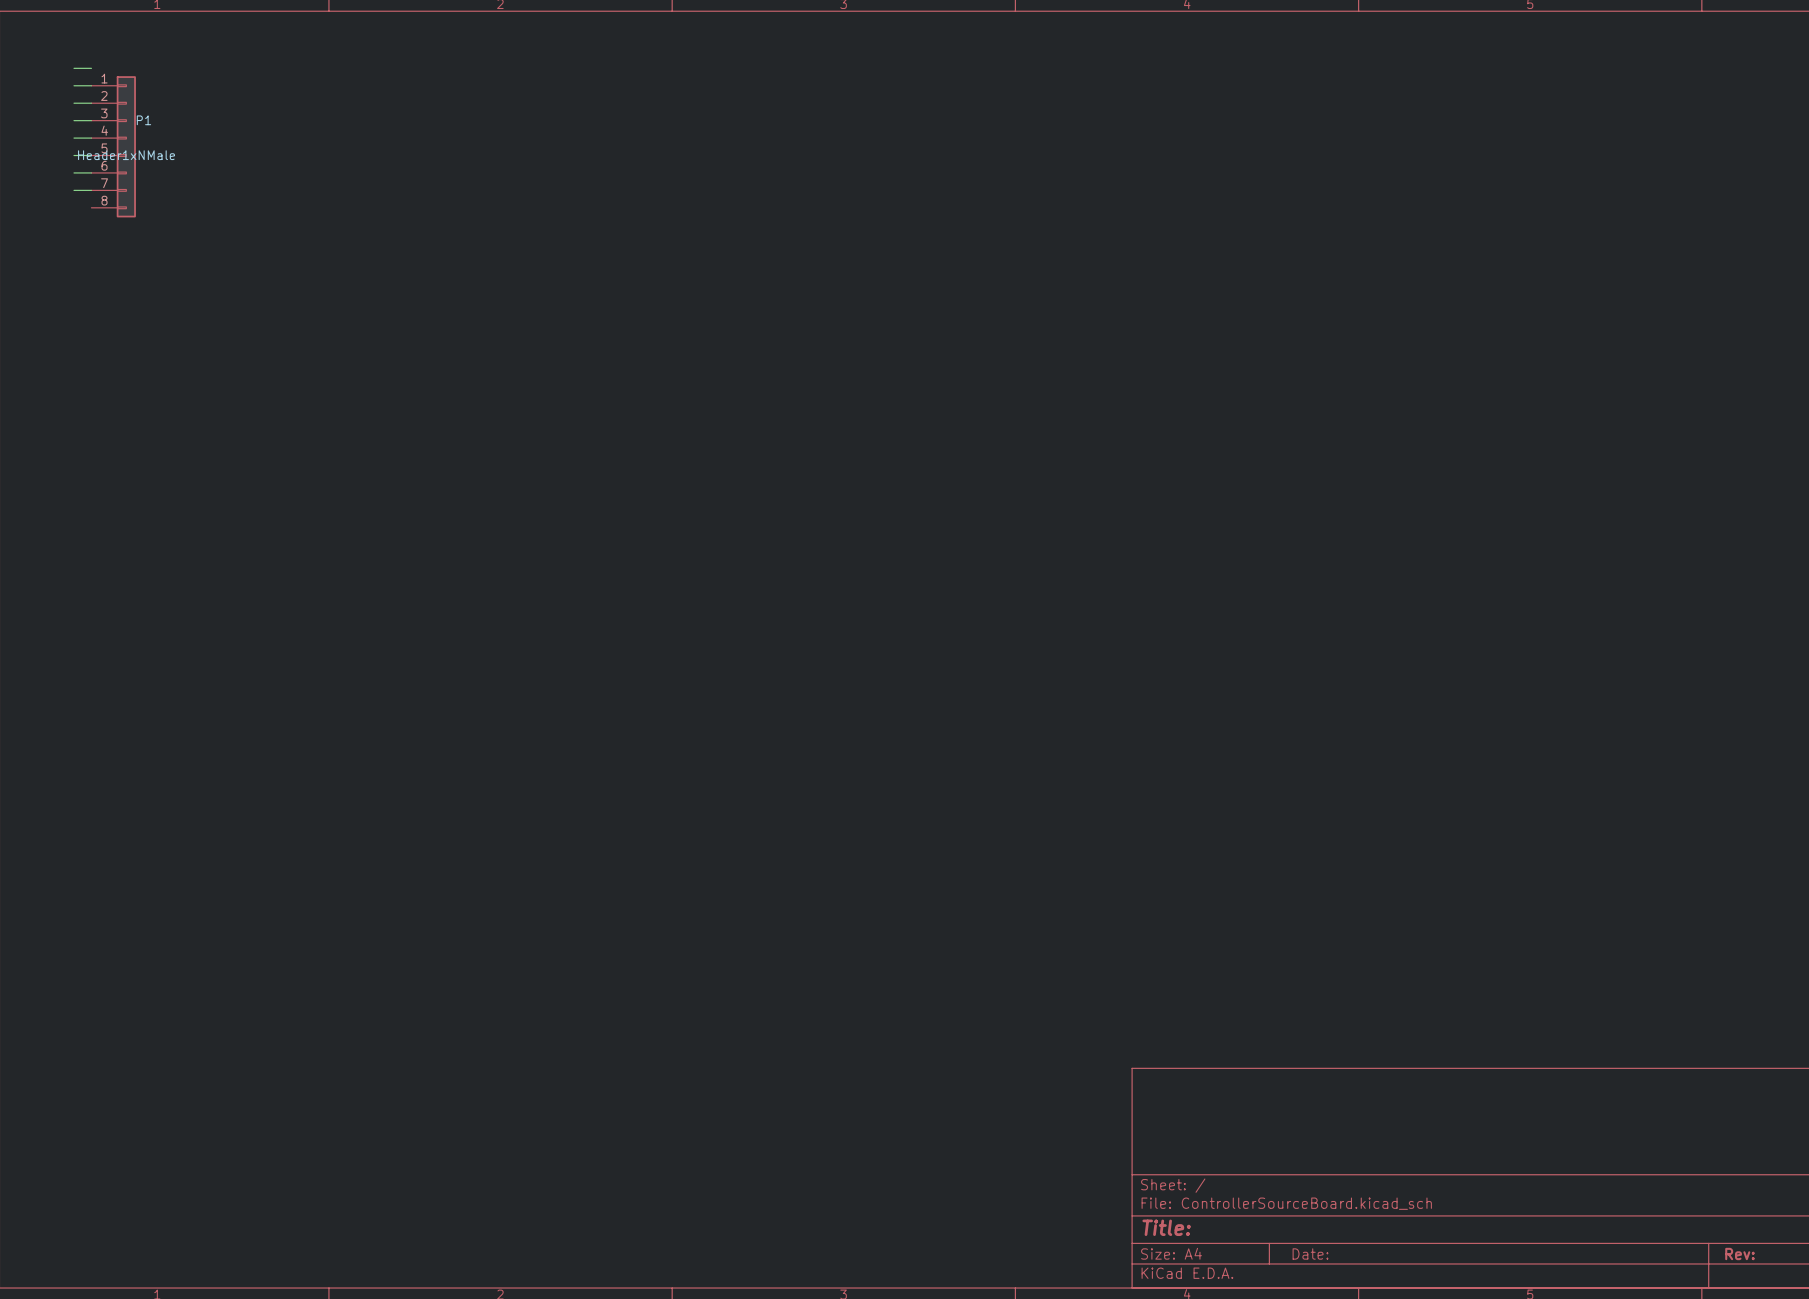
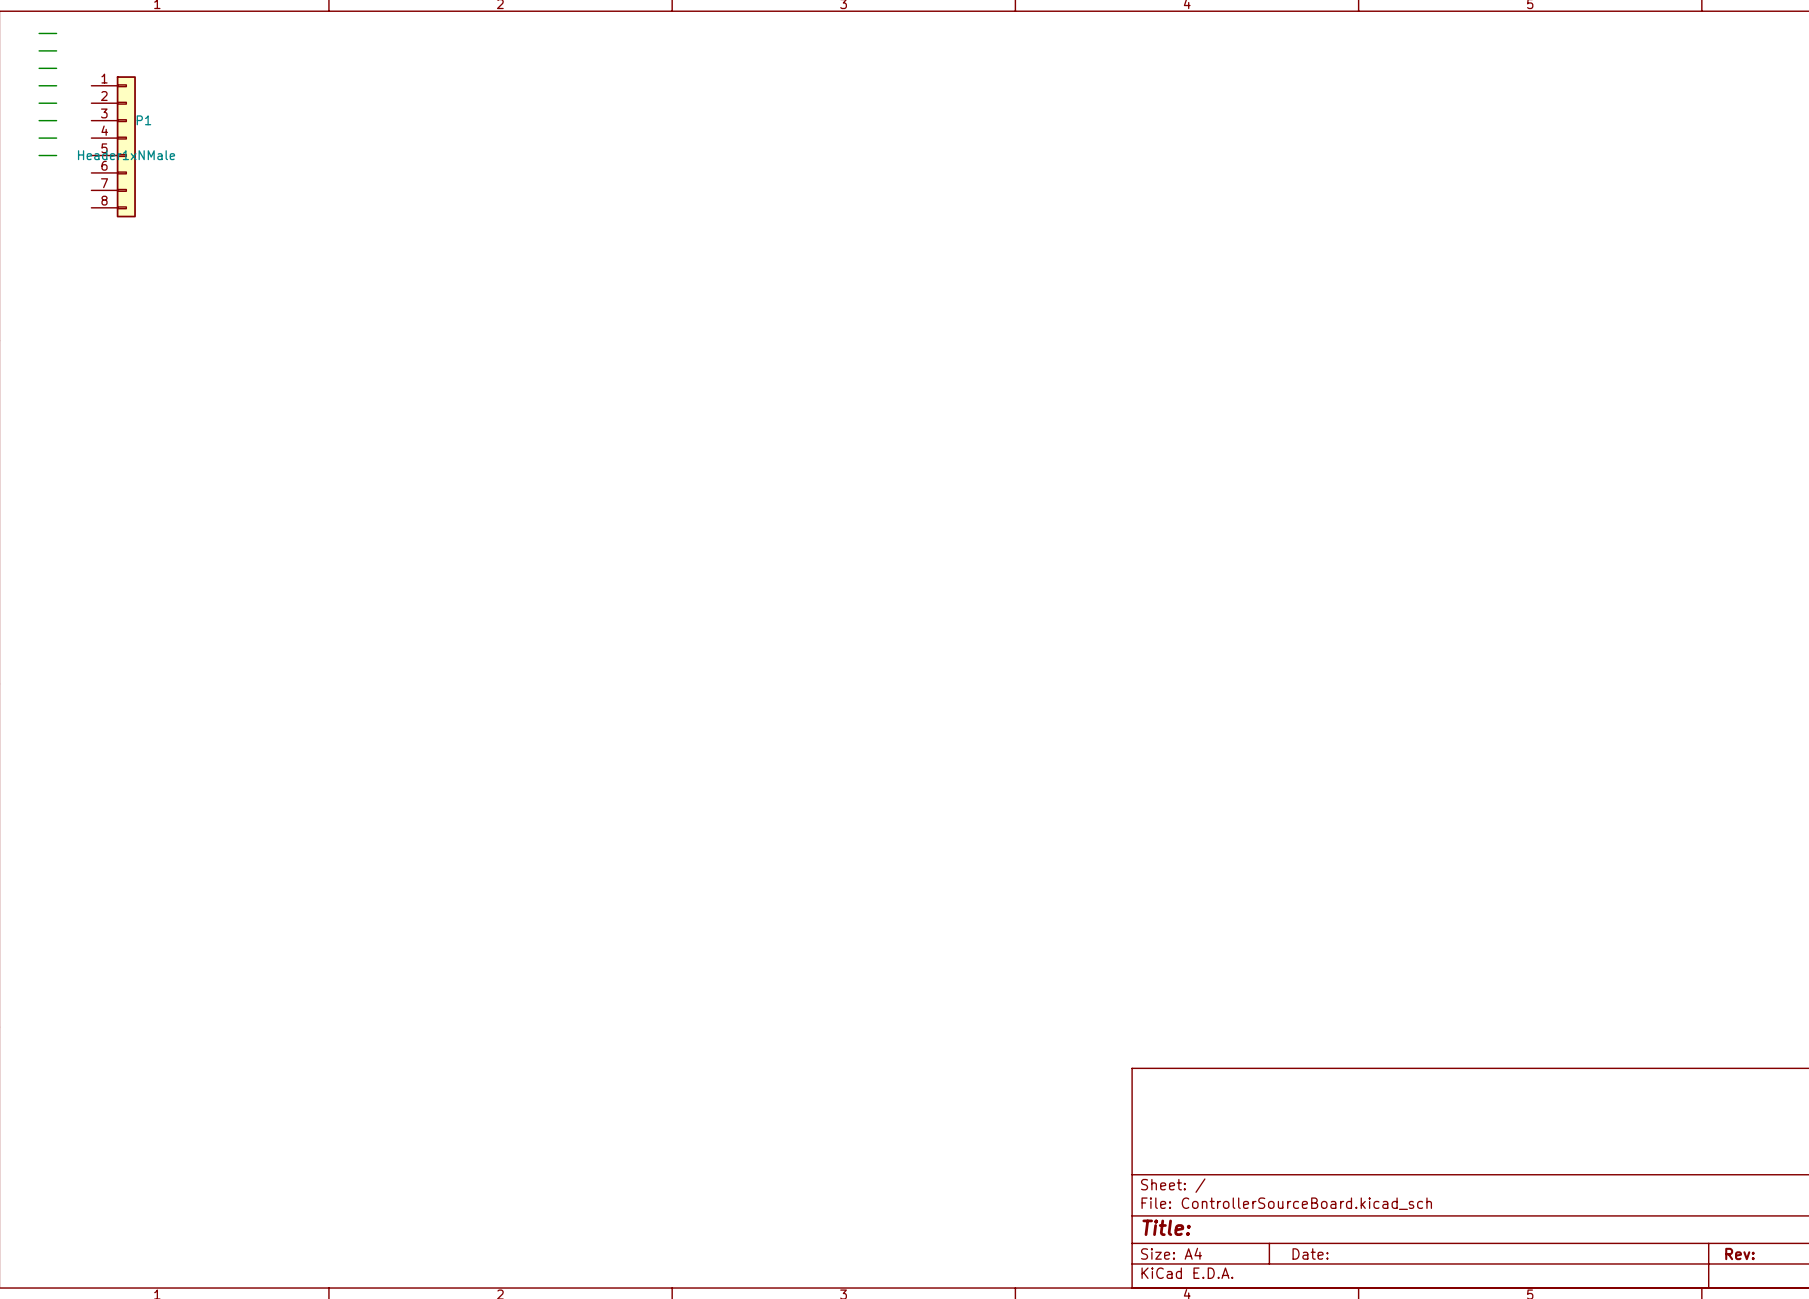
wire: (74, 68) (91, 68) -> (39, 33) (56, 33)
wire: (74, 85) (91, 85) -> (39, 50) (56, 50)
wire: (74, 103) (91, 103) -> (39, 68) (56, 68)
wire: (74, 120) (91, 120) -> (39, 85) (56, 85)
wire: (74, 138) (91, 138) -> (39, 103) (56, 103)
wire: (74, 155) (91, 155) -> (39, 120) (56, 120)
wire: (74, 172) (91, 172) -> (39, 138) (56, 138)
wire: (74, 190) (91, 190) -> (39, 155) (56, 155)

